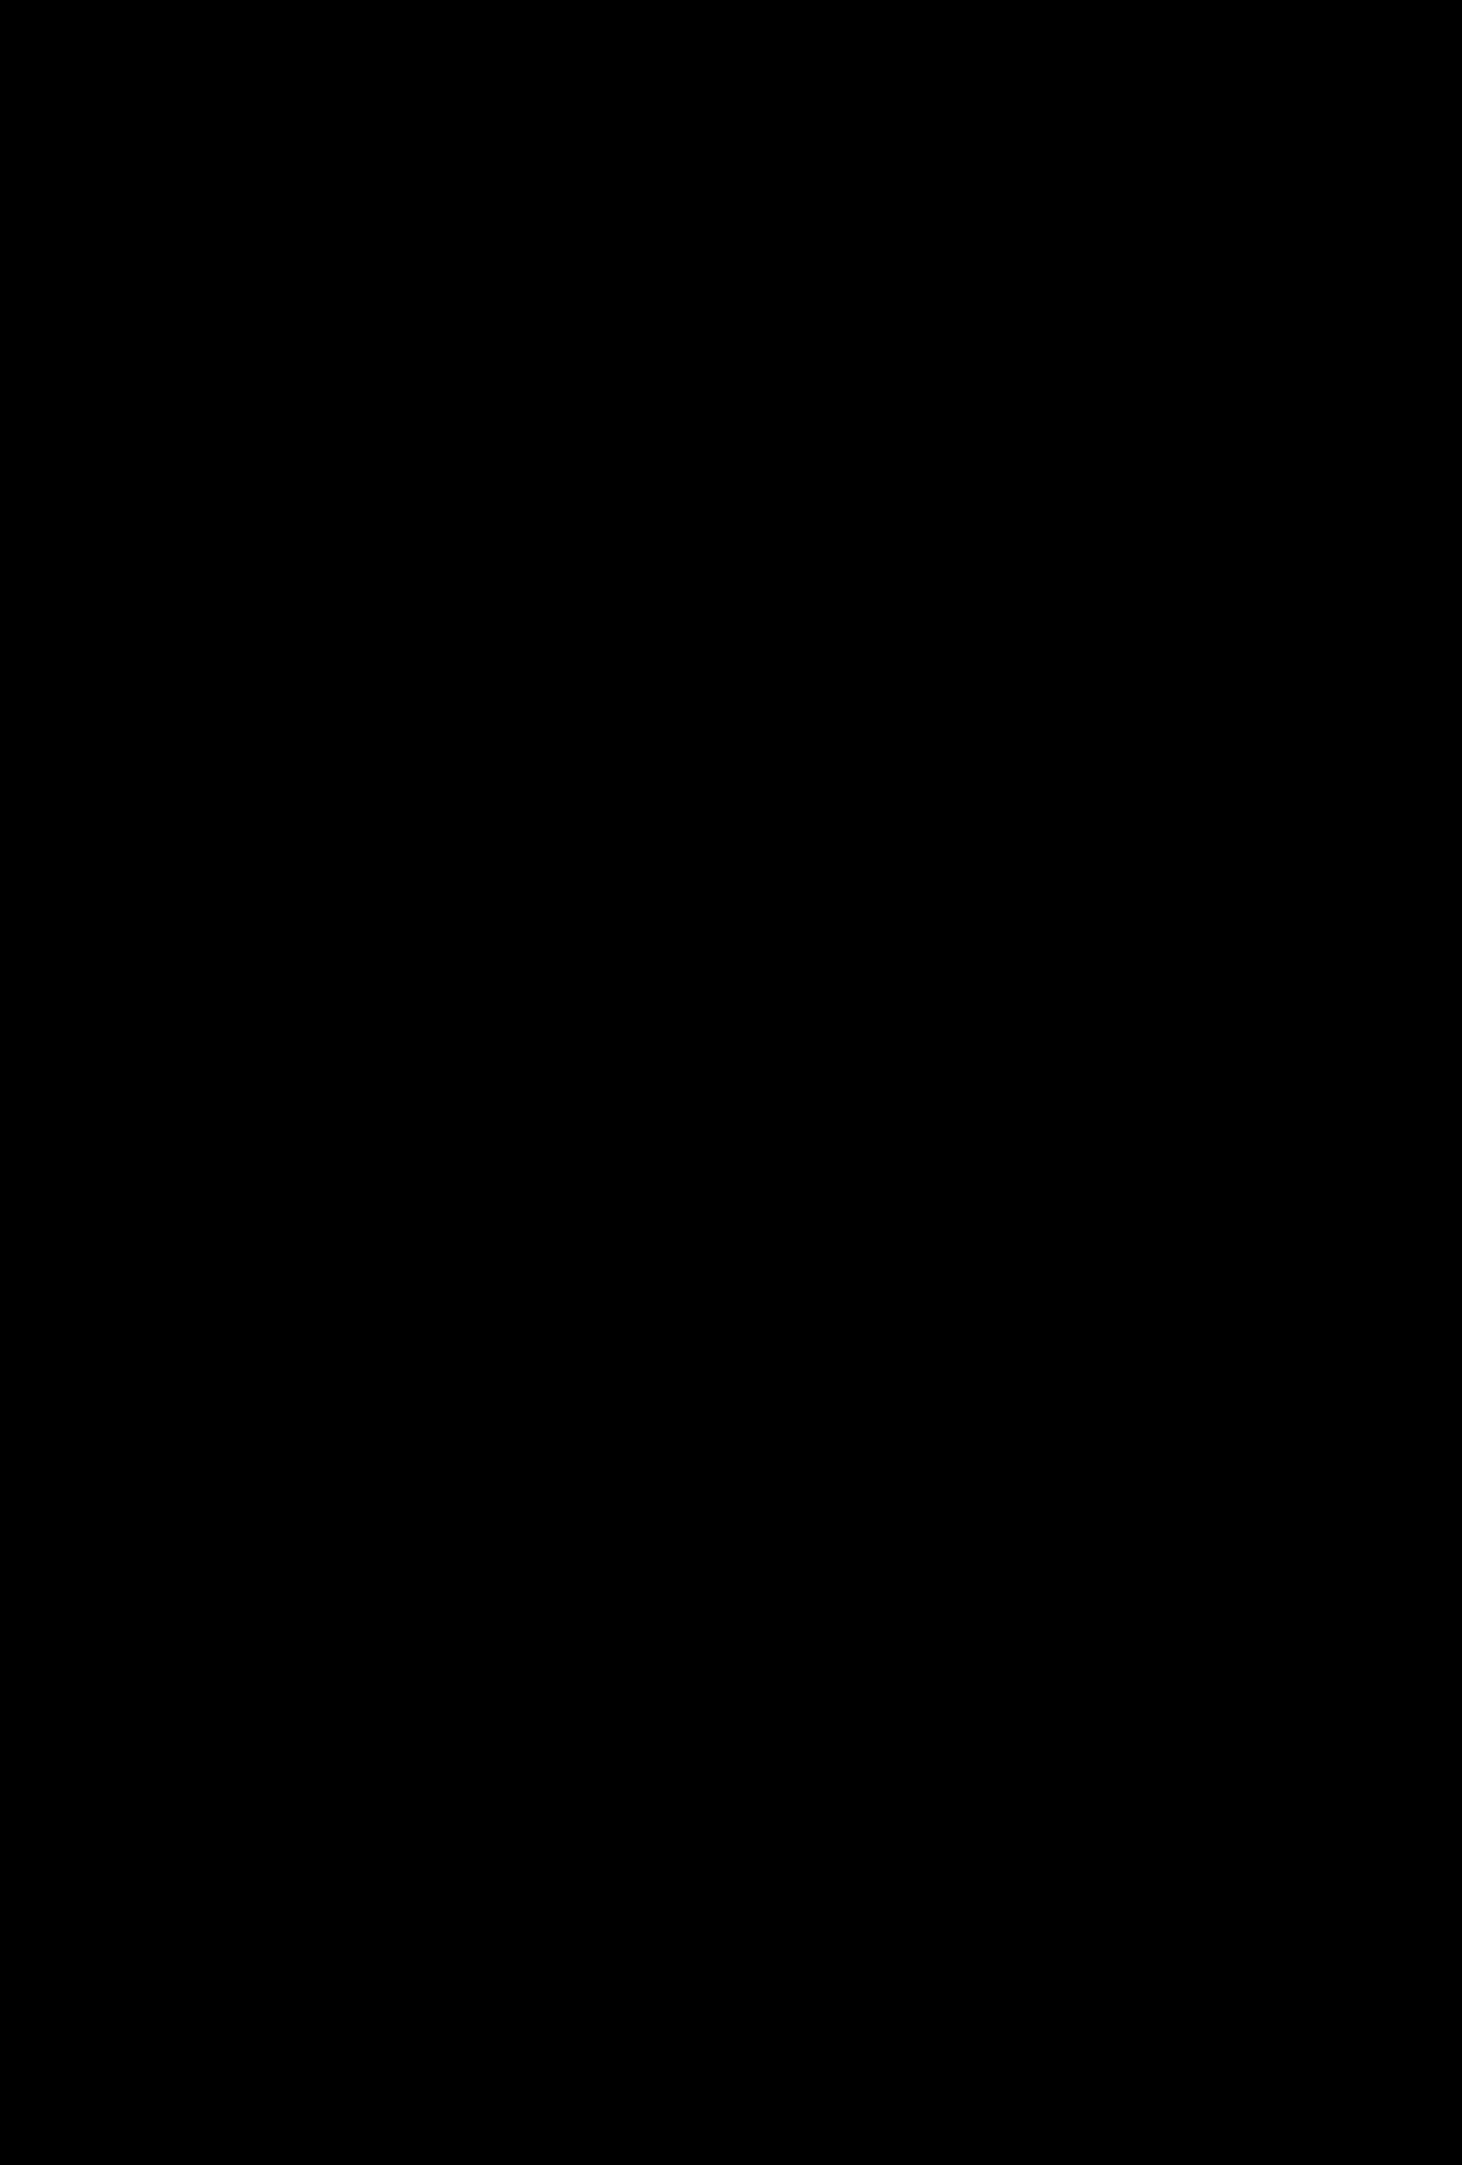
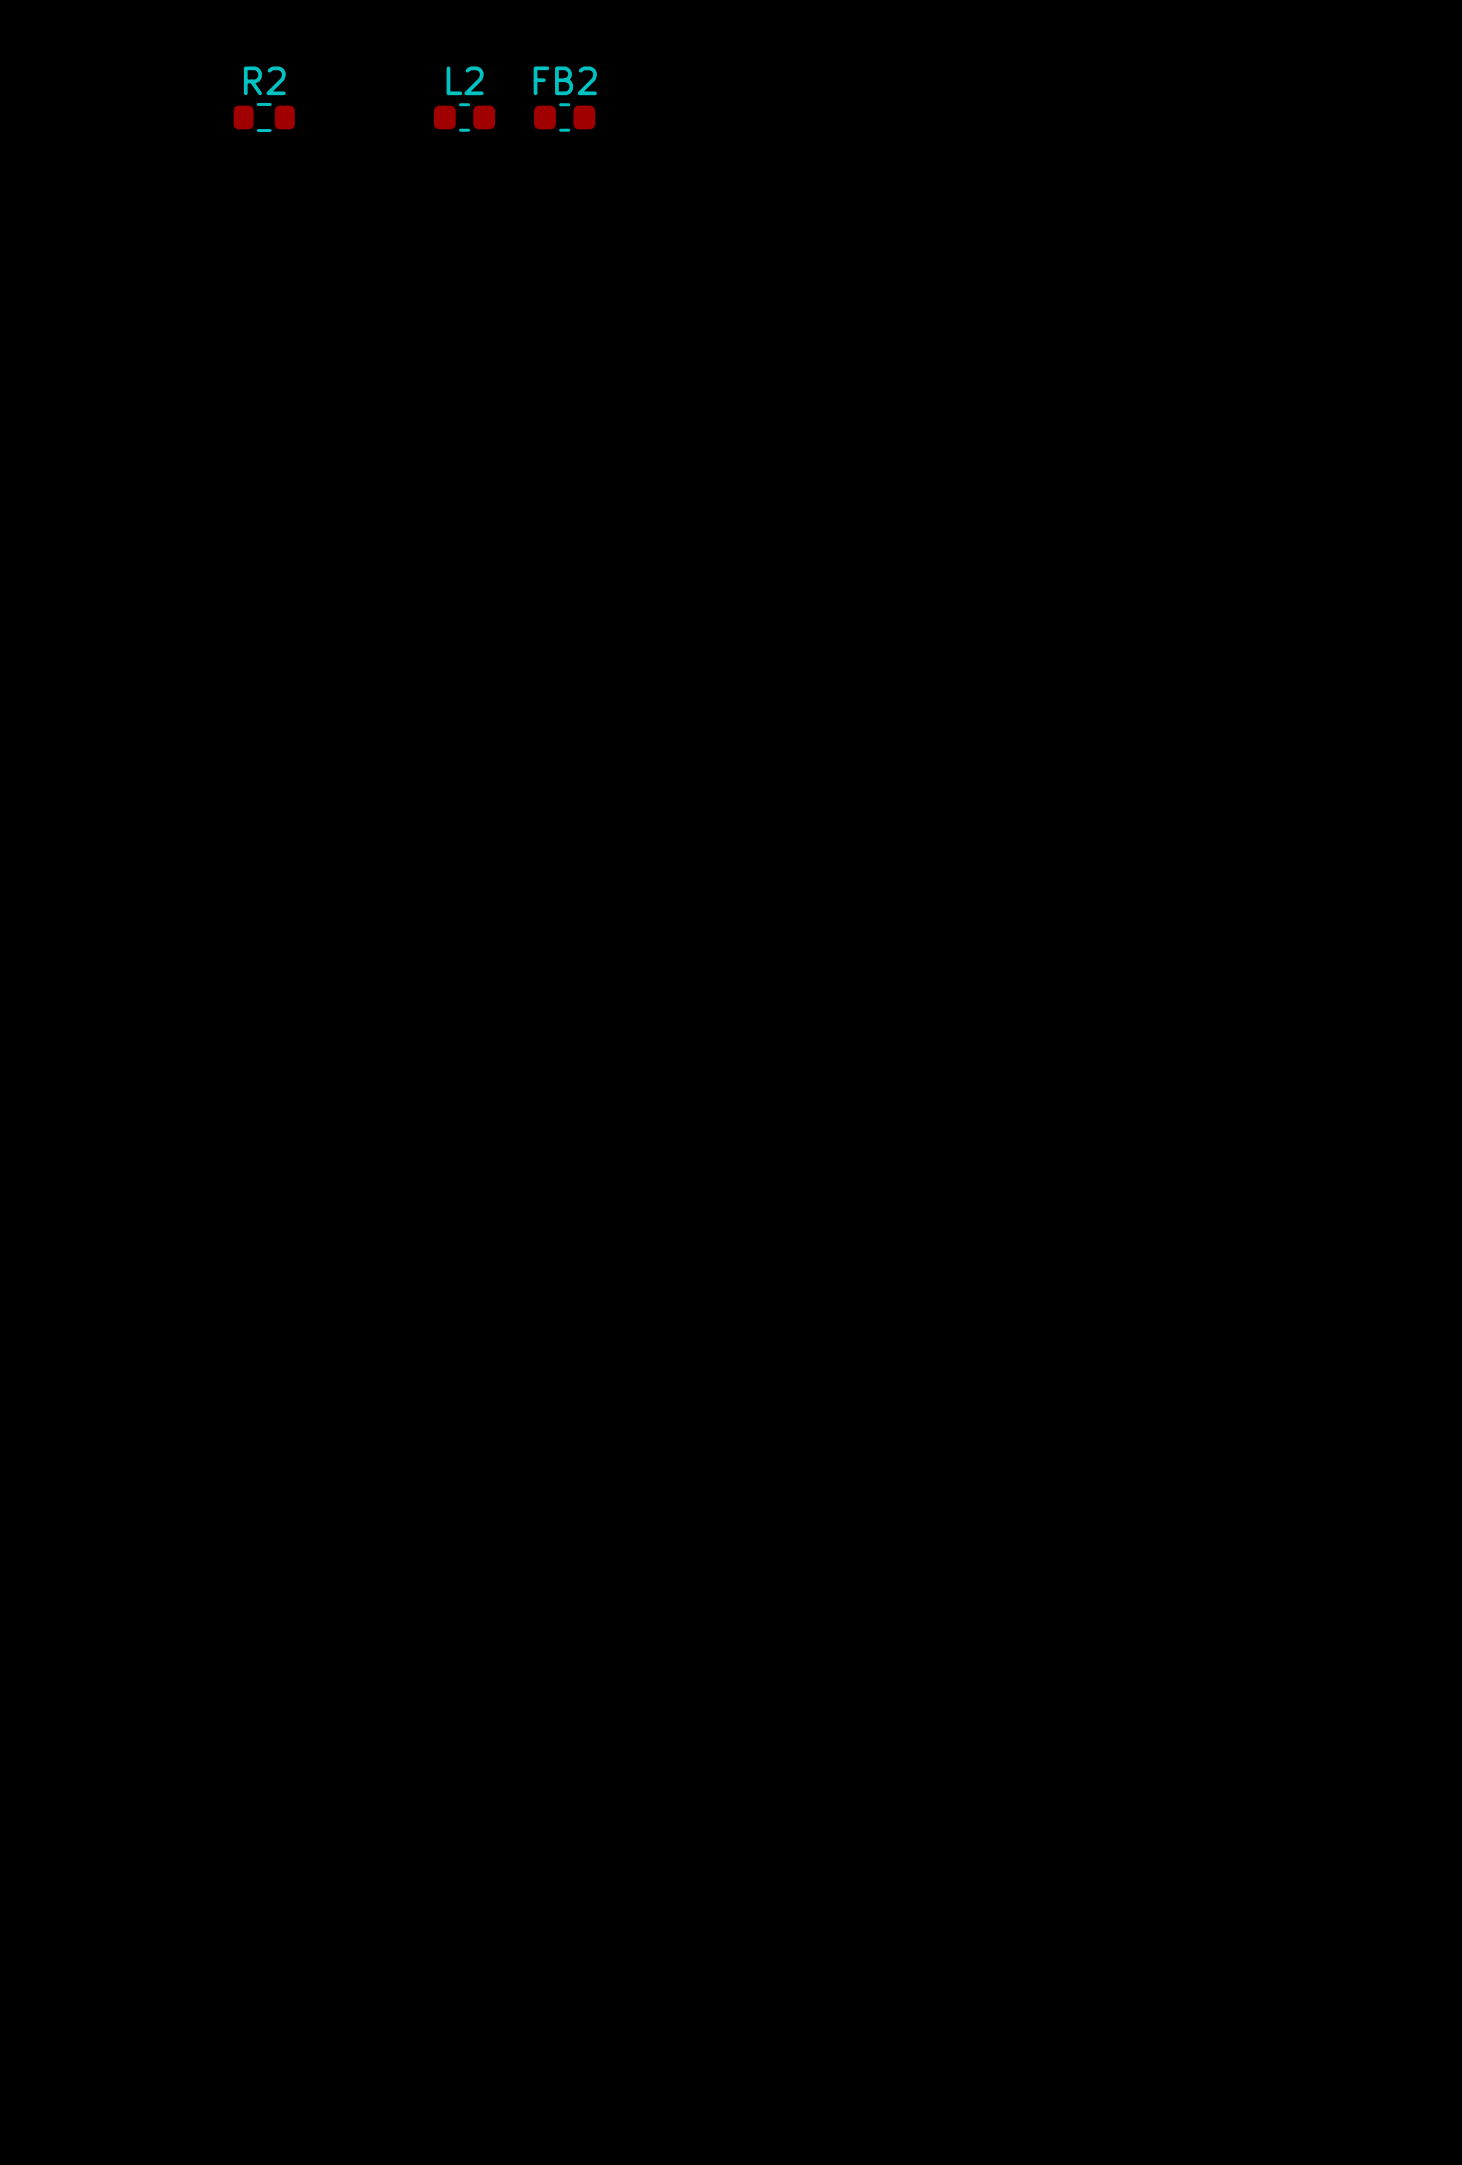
R2: none -> (264, 117)
L2: none -> (464, 117)
FB2: none -> (564, 117)

